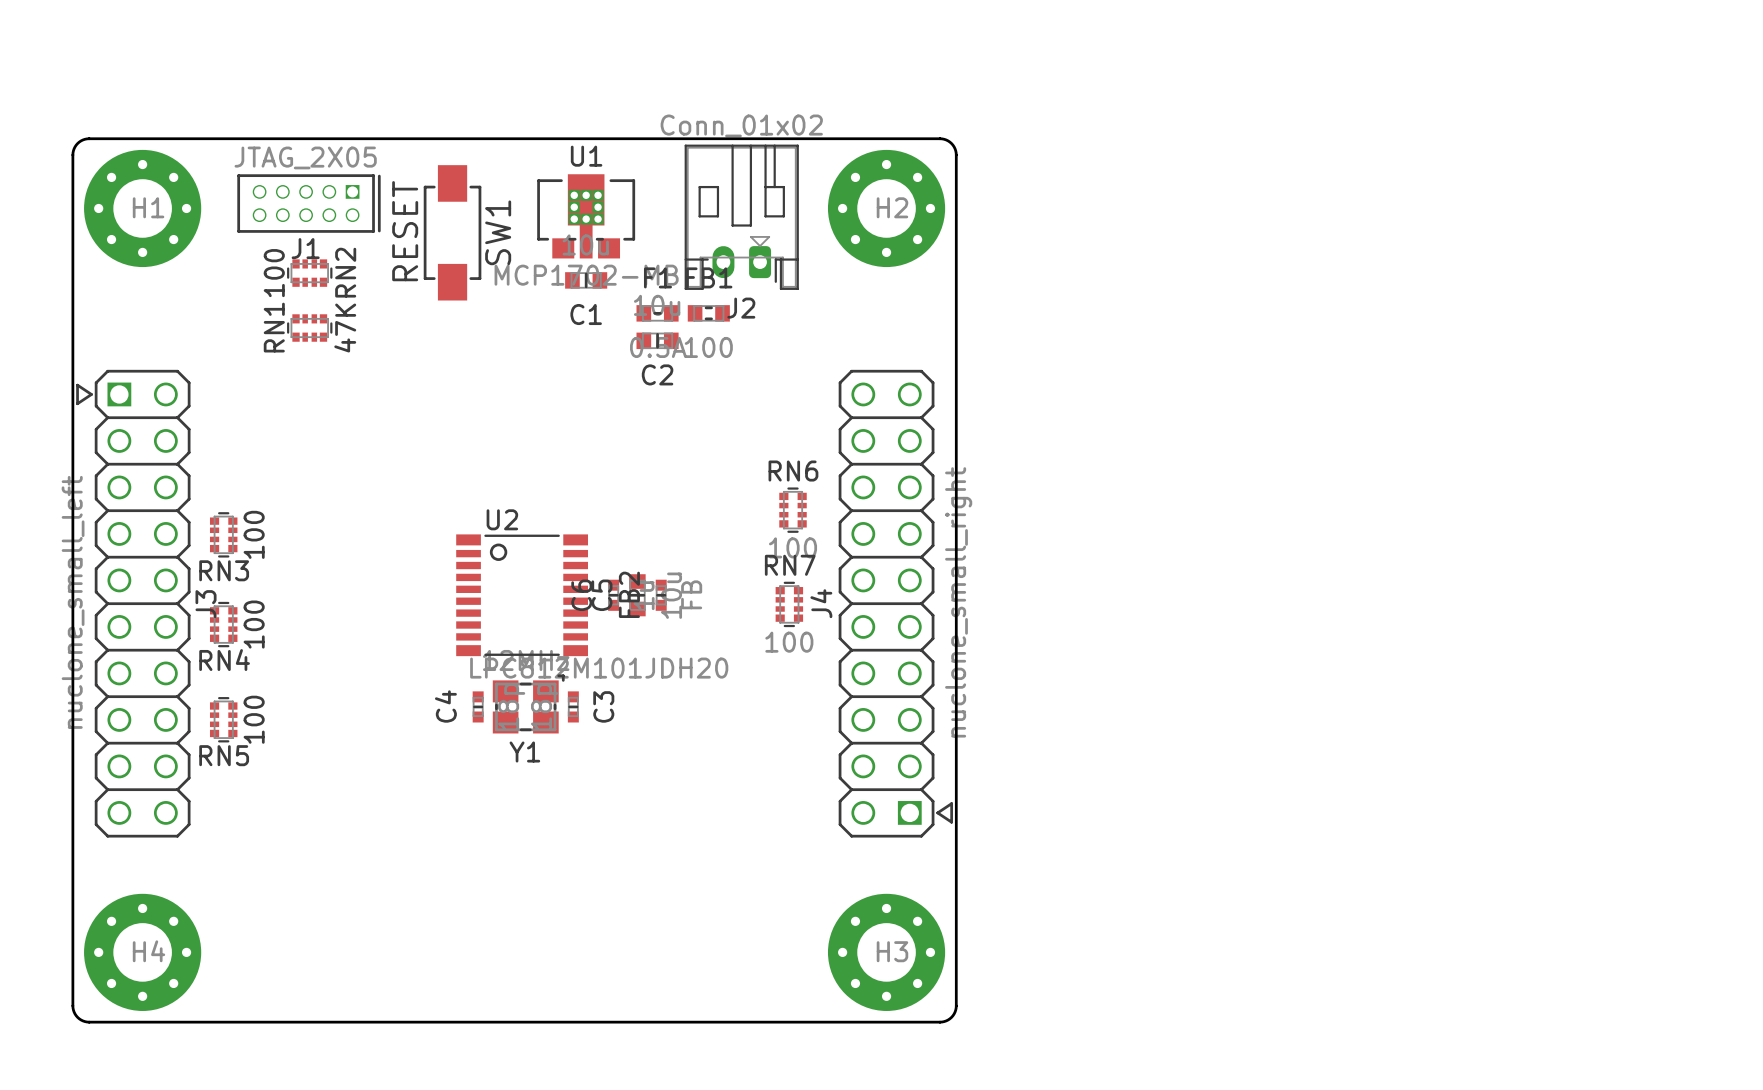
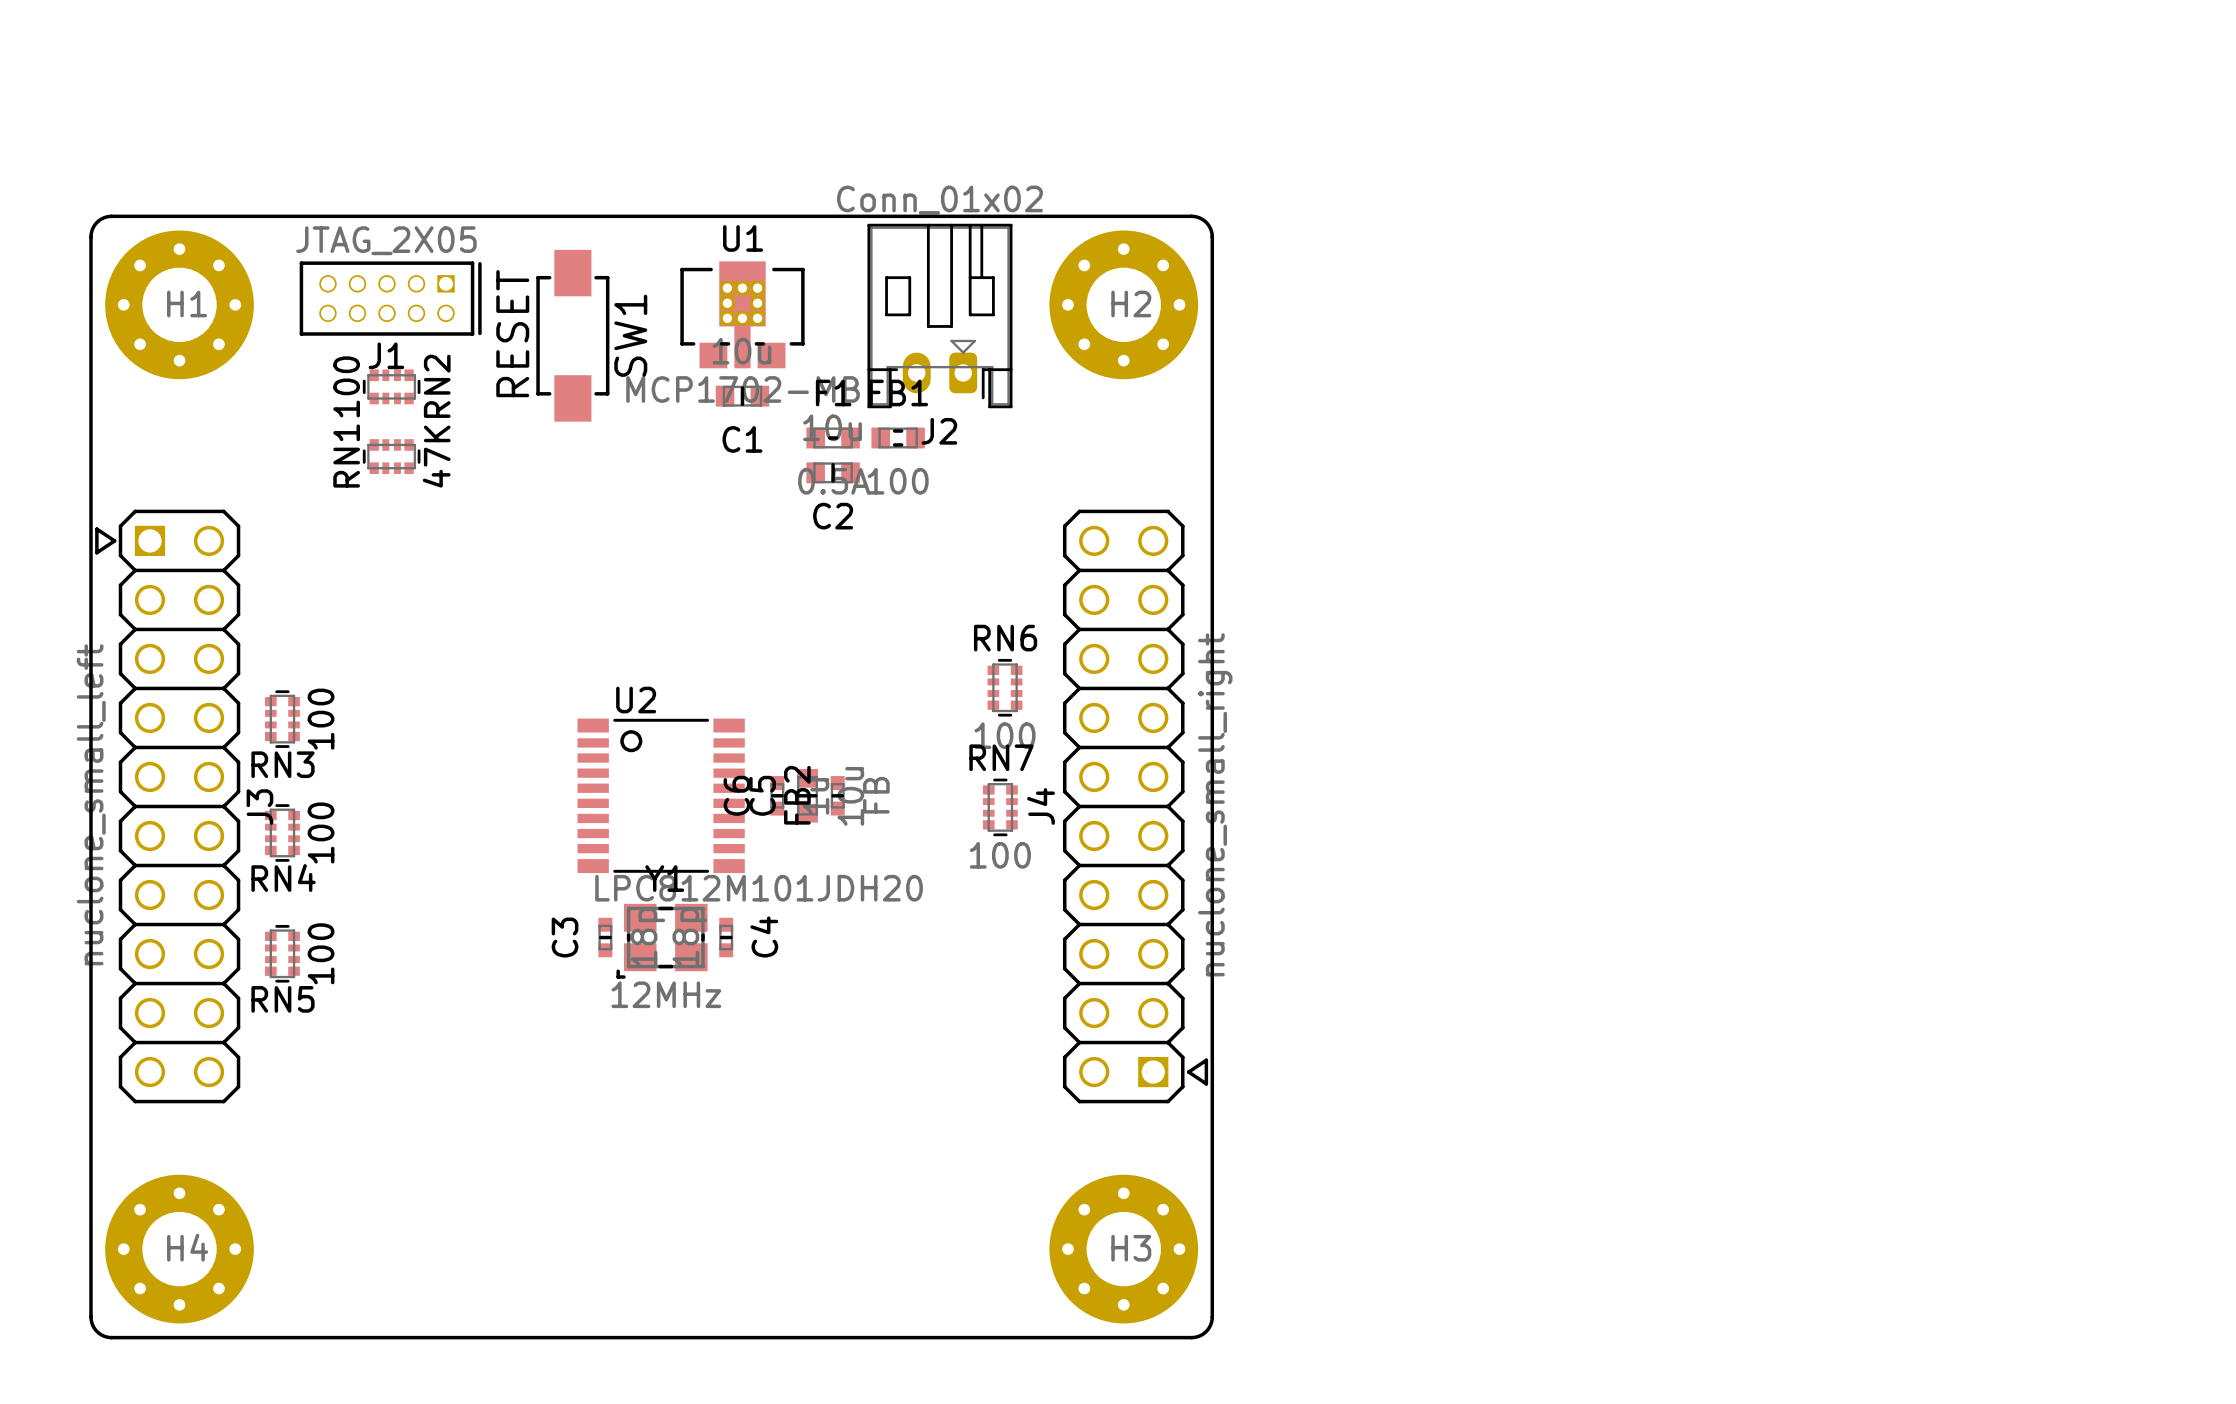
Y1 rotation: 0° (528, 703) -> 180° (662, 941)
C4 name: C4 (445, 706) -> C3 (565, 937)
C3 name: C3 (603, 706) -> C4 (764, 936)

